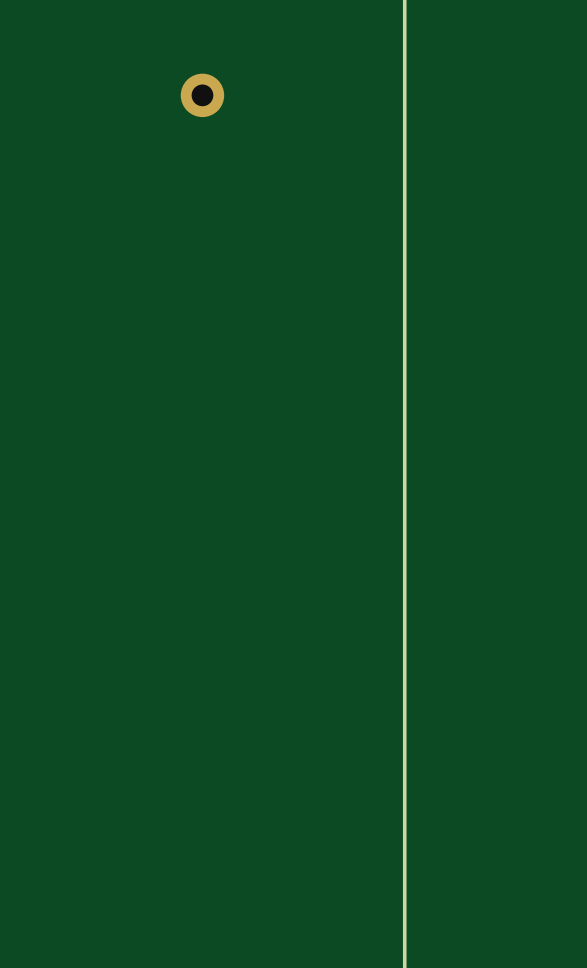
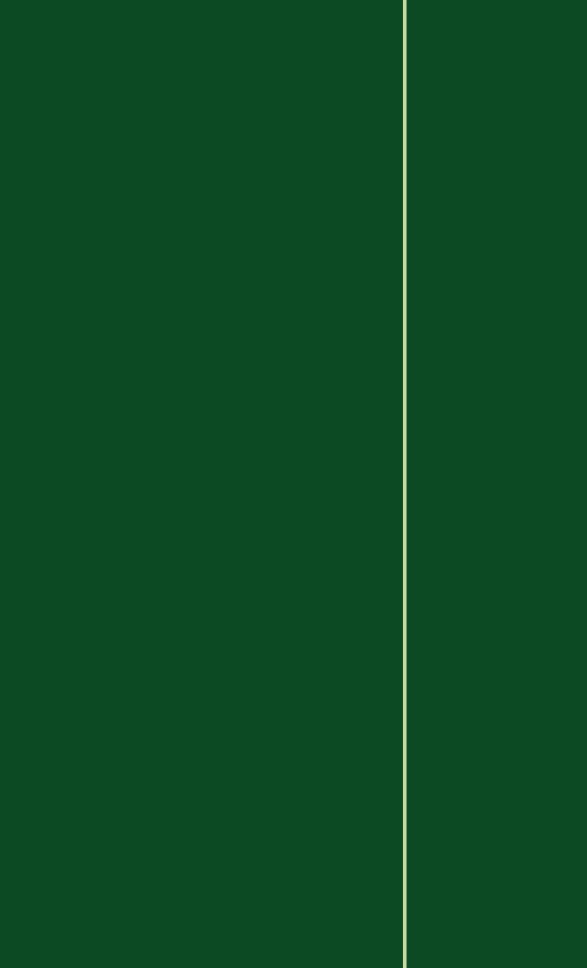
via: (202, 95) -> none

